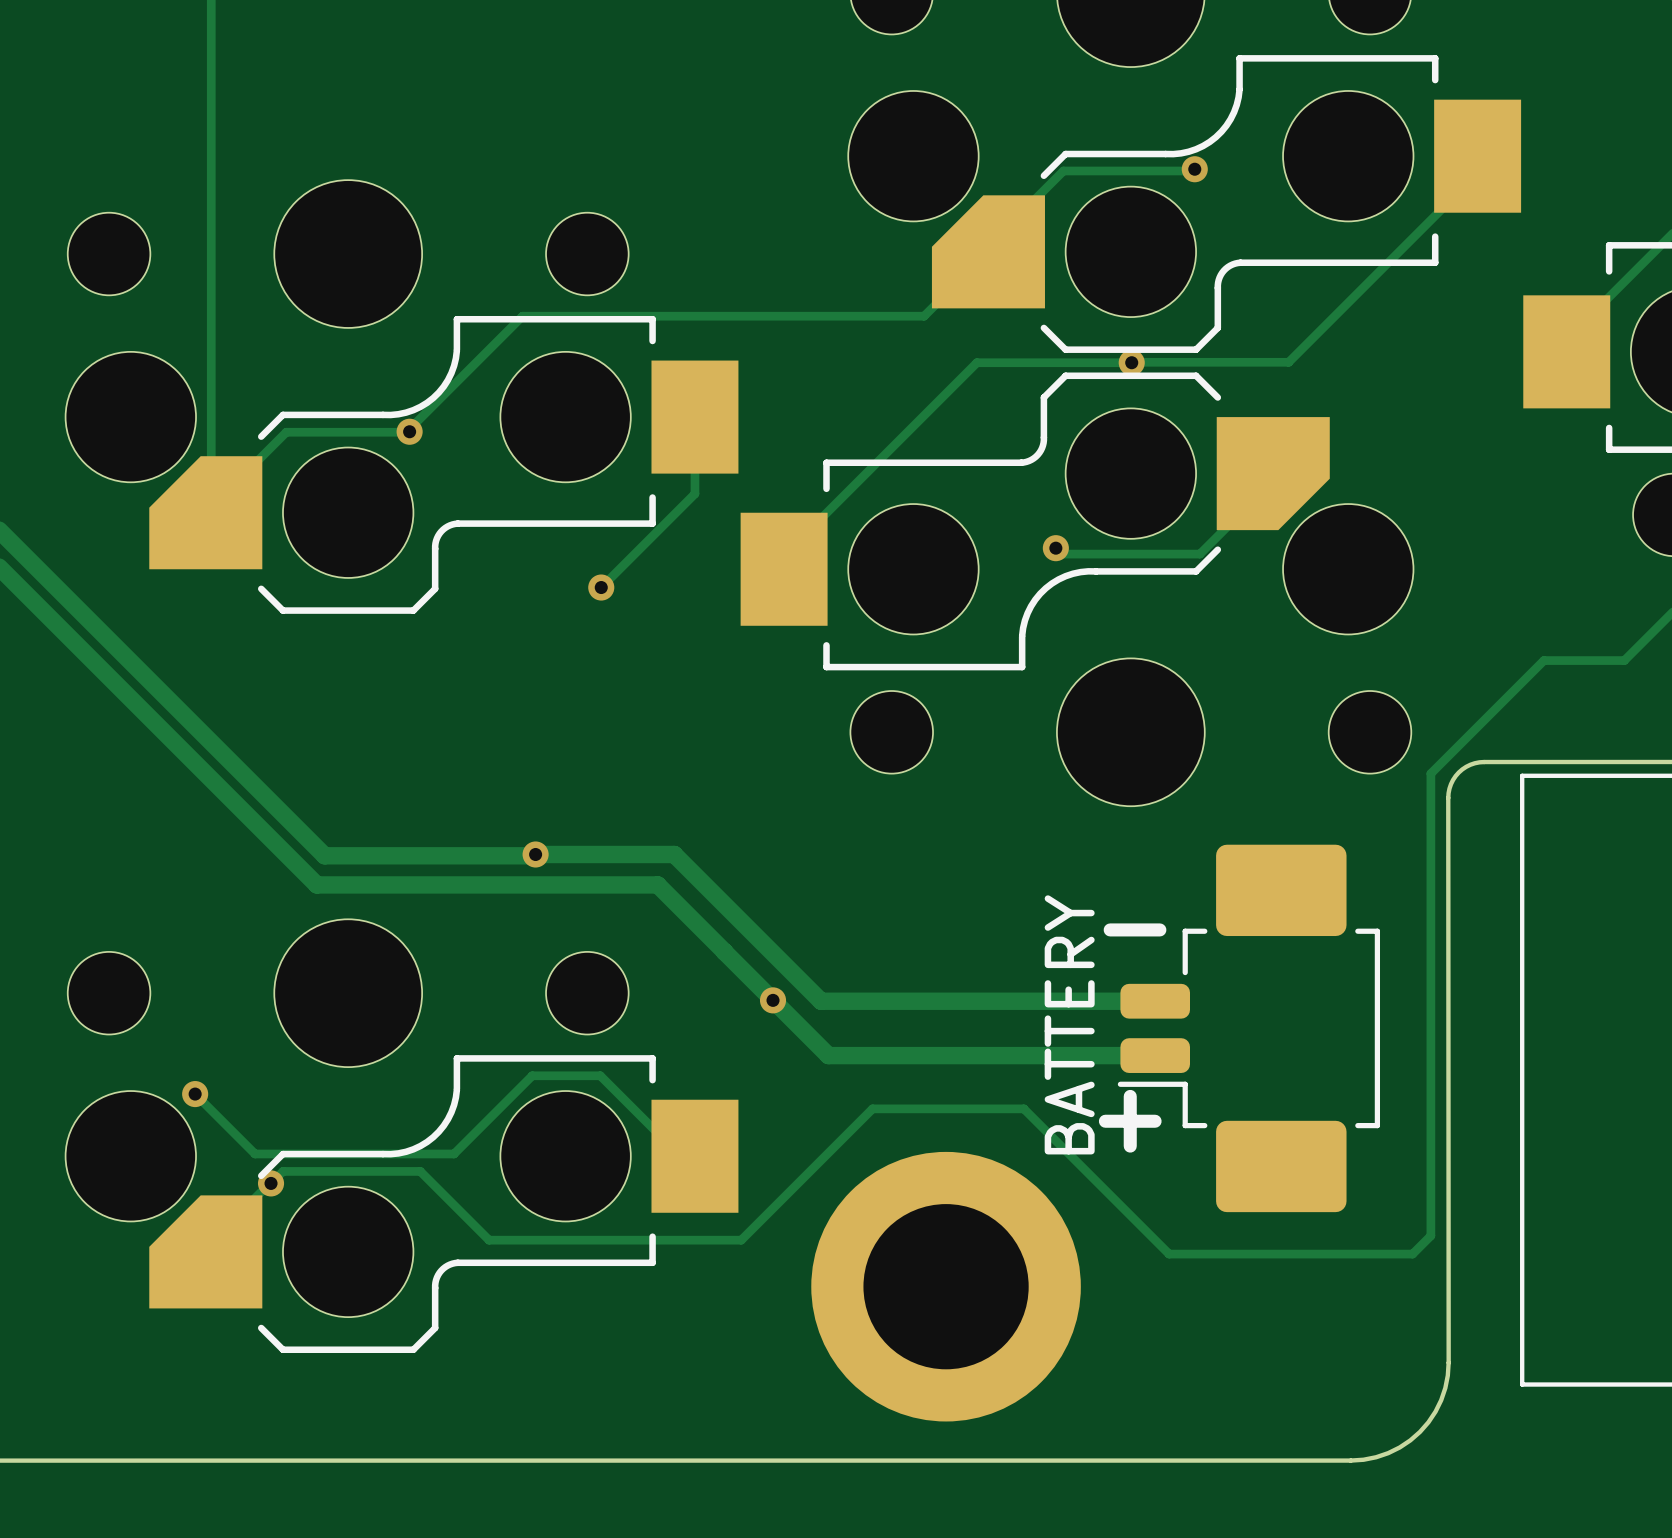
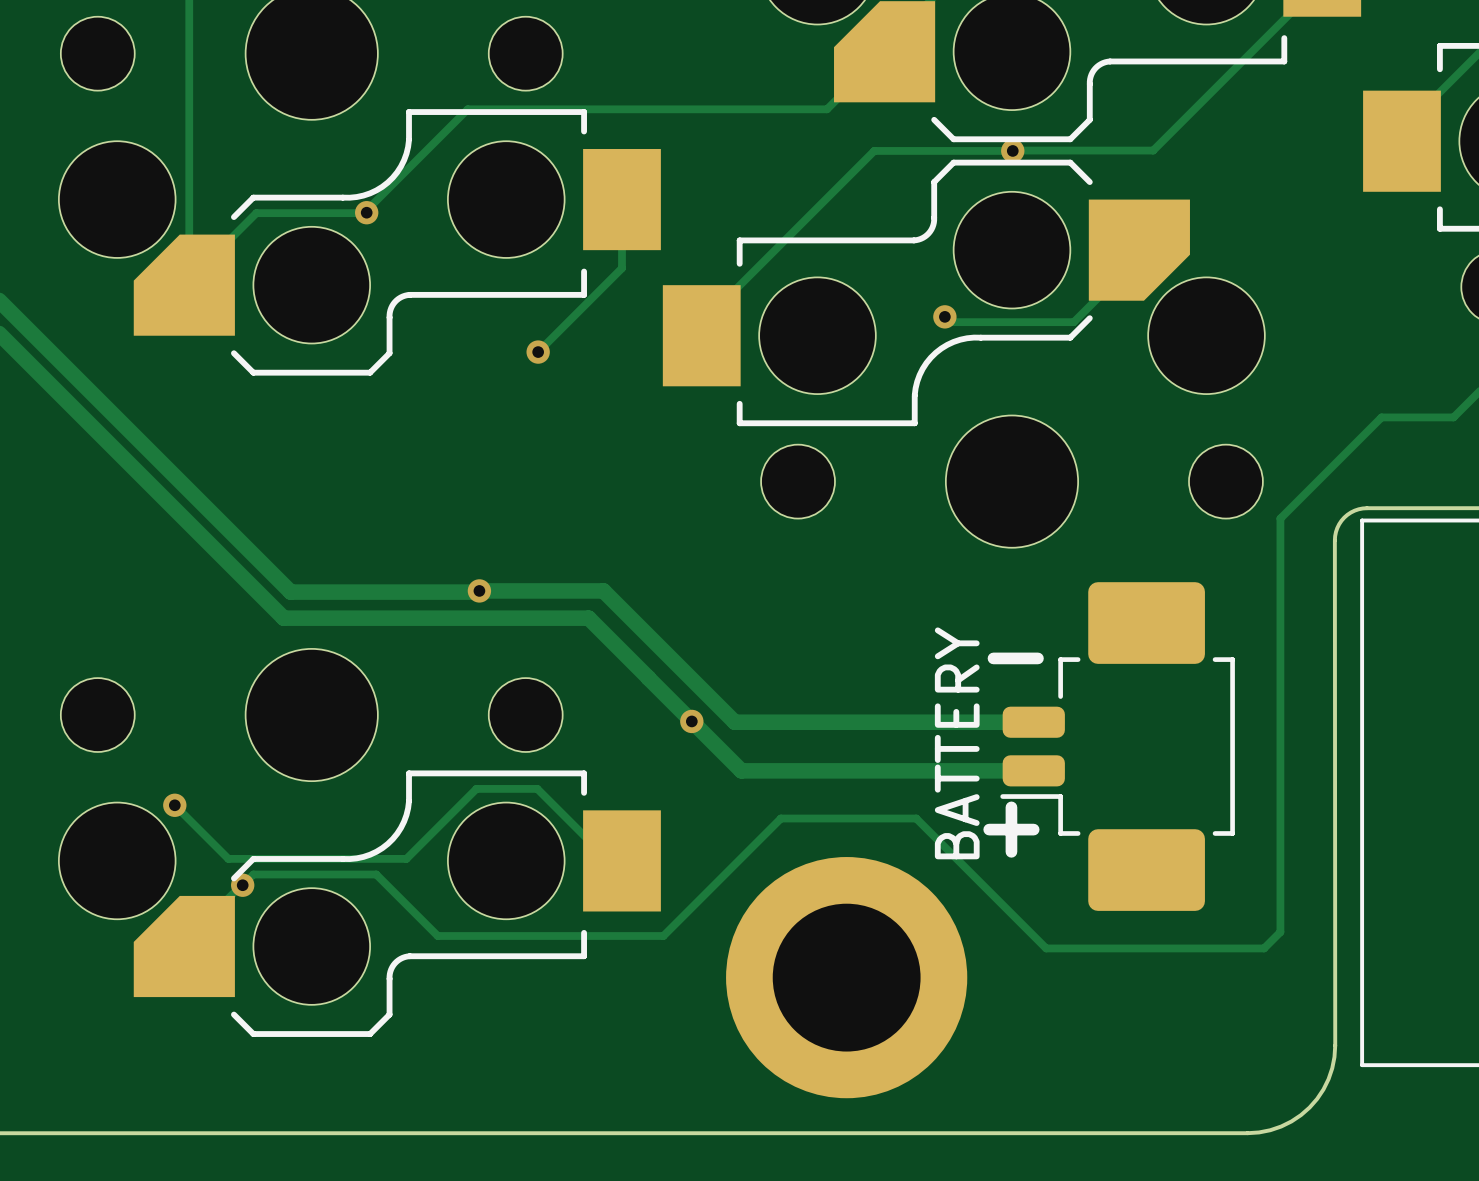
board edge: (1527, 762) (1484, 762) (1470, 764) (1455, 776) (1448, 793) (1448, 1362) (1445, 1388) (1435, 1411) (1428, 1422) (1410, 1440) (1388, 1453) (1363, 1459) (1350, 1460) -> (1334, 540) (1335, 1045) (1332, 1068) (1317, 1098) (1291, 1121) (1259, 1132) (1208, 1133)
board edge: none -> (1366, 508) (1354, 510) (1344, 517) (1337, 528) (1334, 540)

